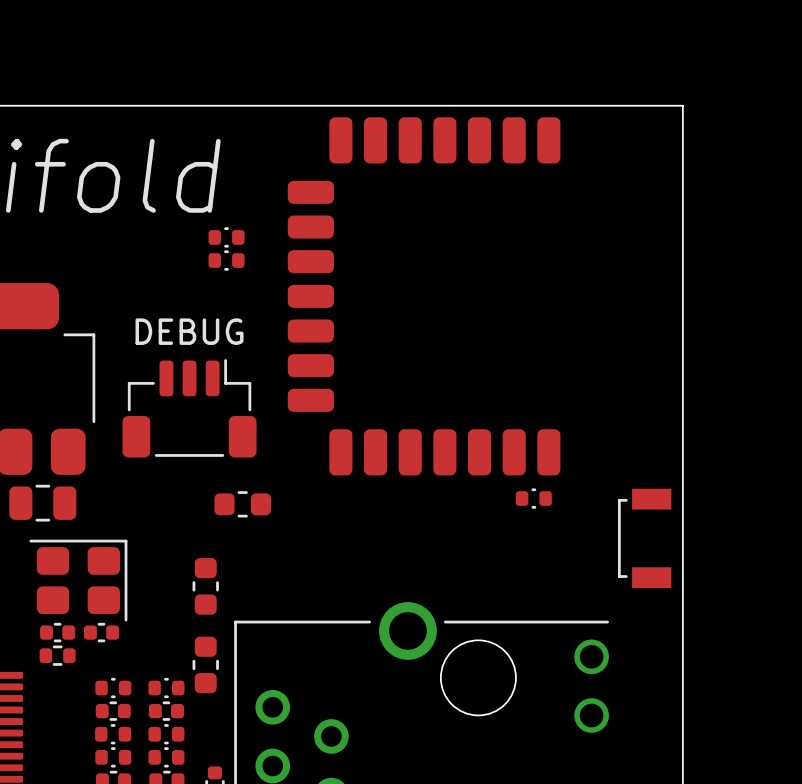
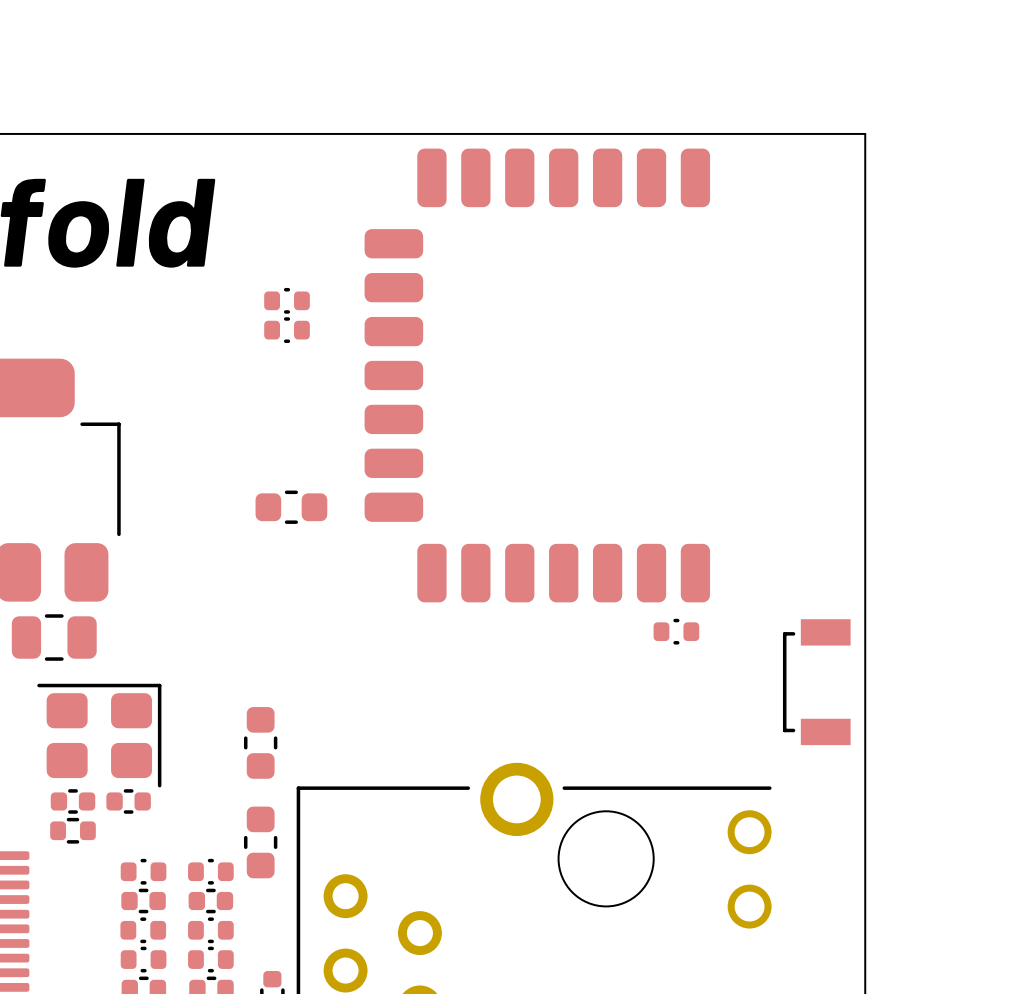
text: DEBUG (189, 331) -> none
part: (189, 408) -> none
part position: (242, 504) -> (291, 507)

